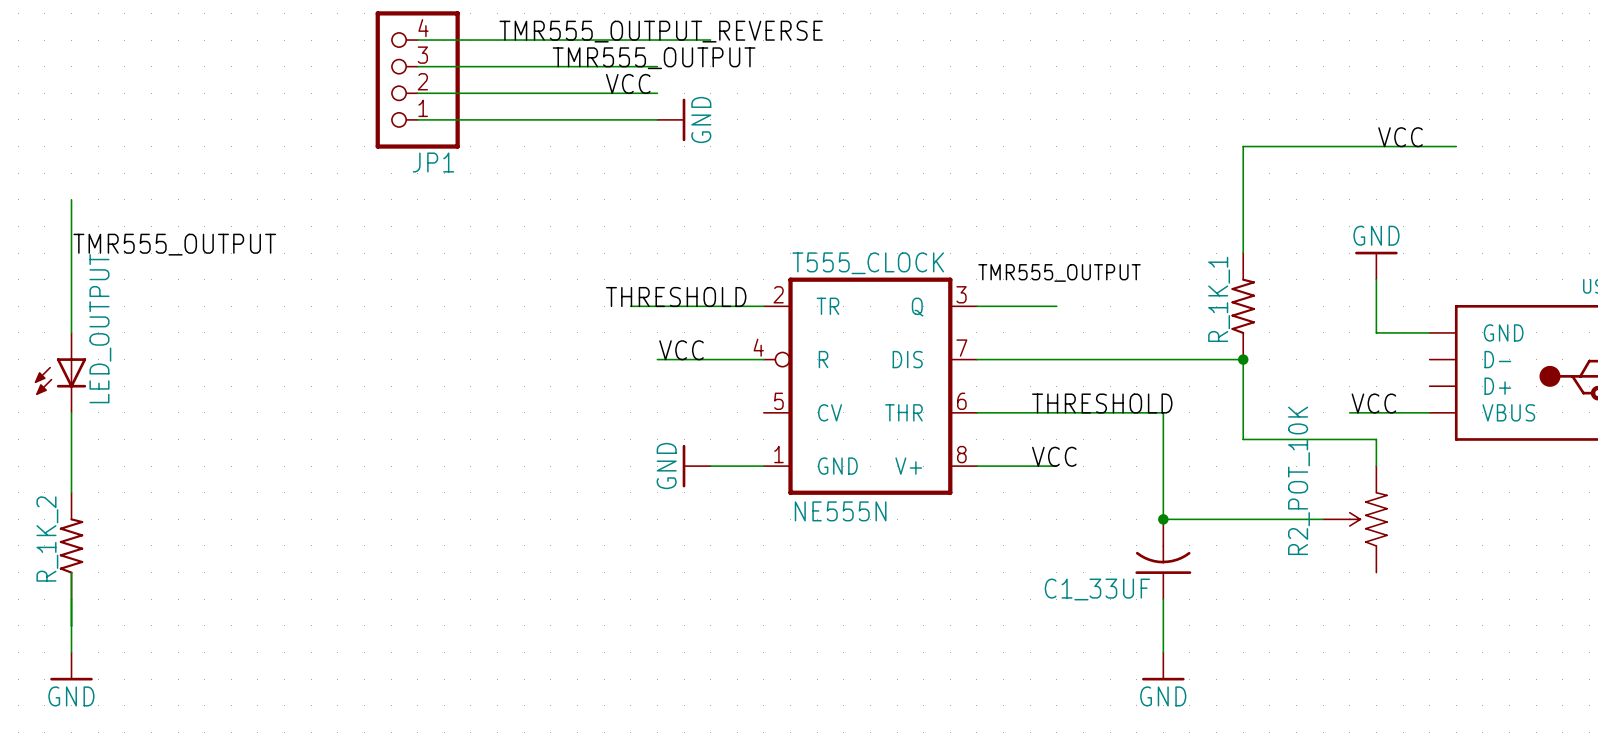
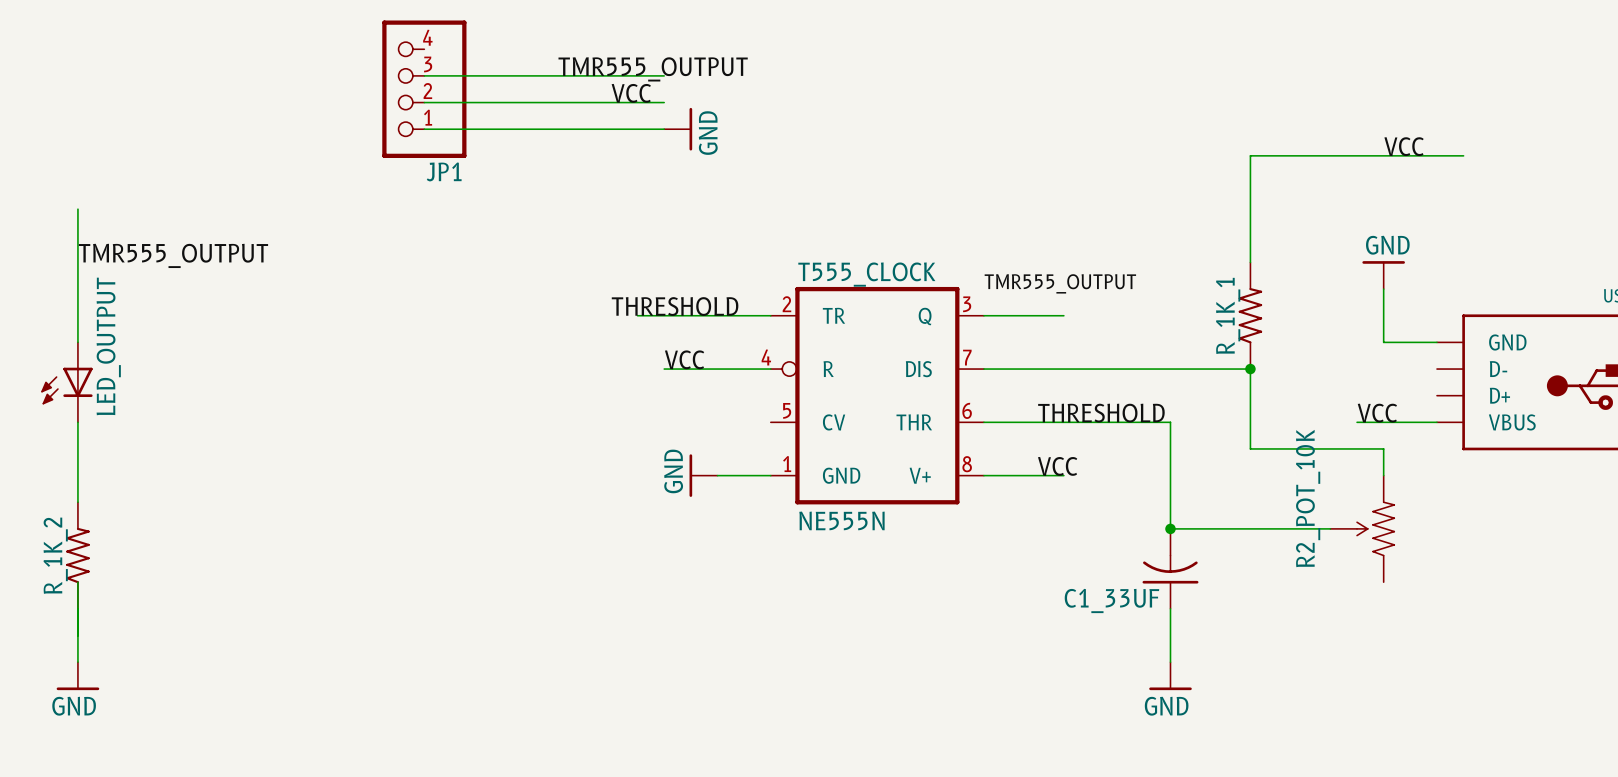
label: TMR555_OUTPUT_REVERSE (661, 31) -> none
wire: (417, 40) (710, 40) -> none

